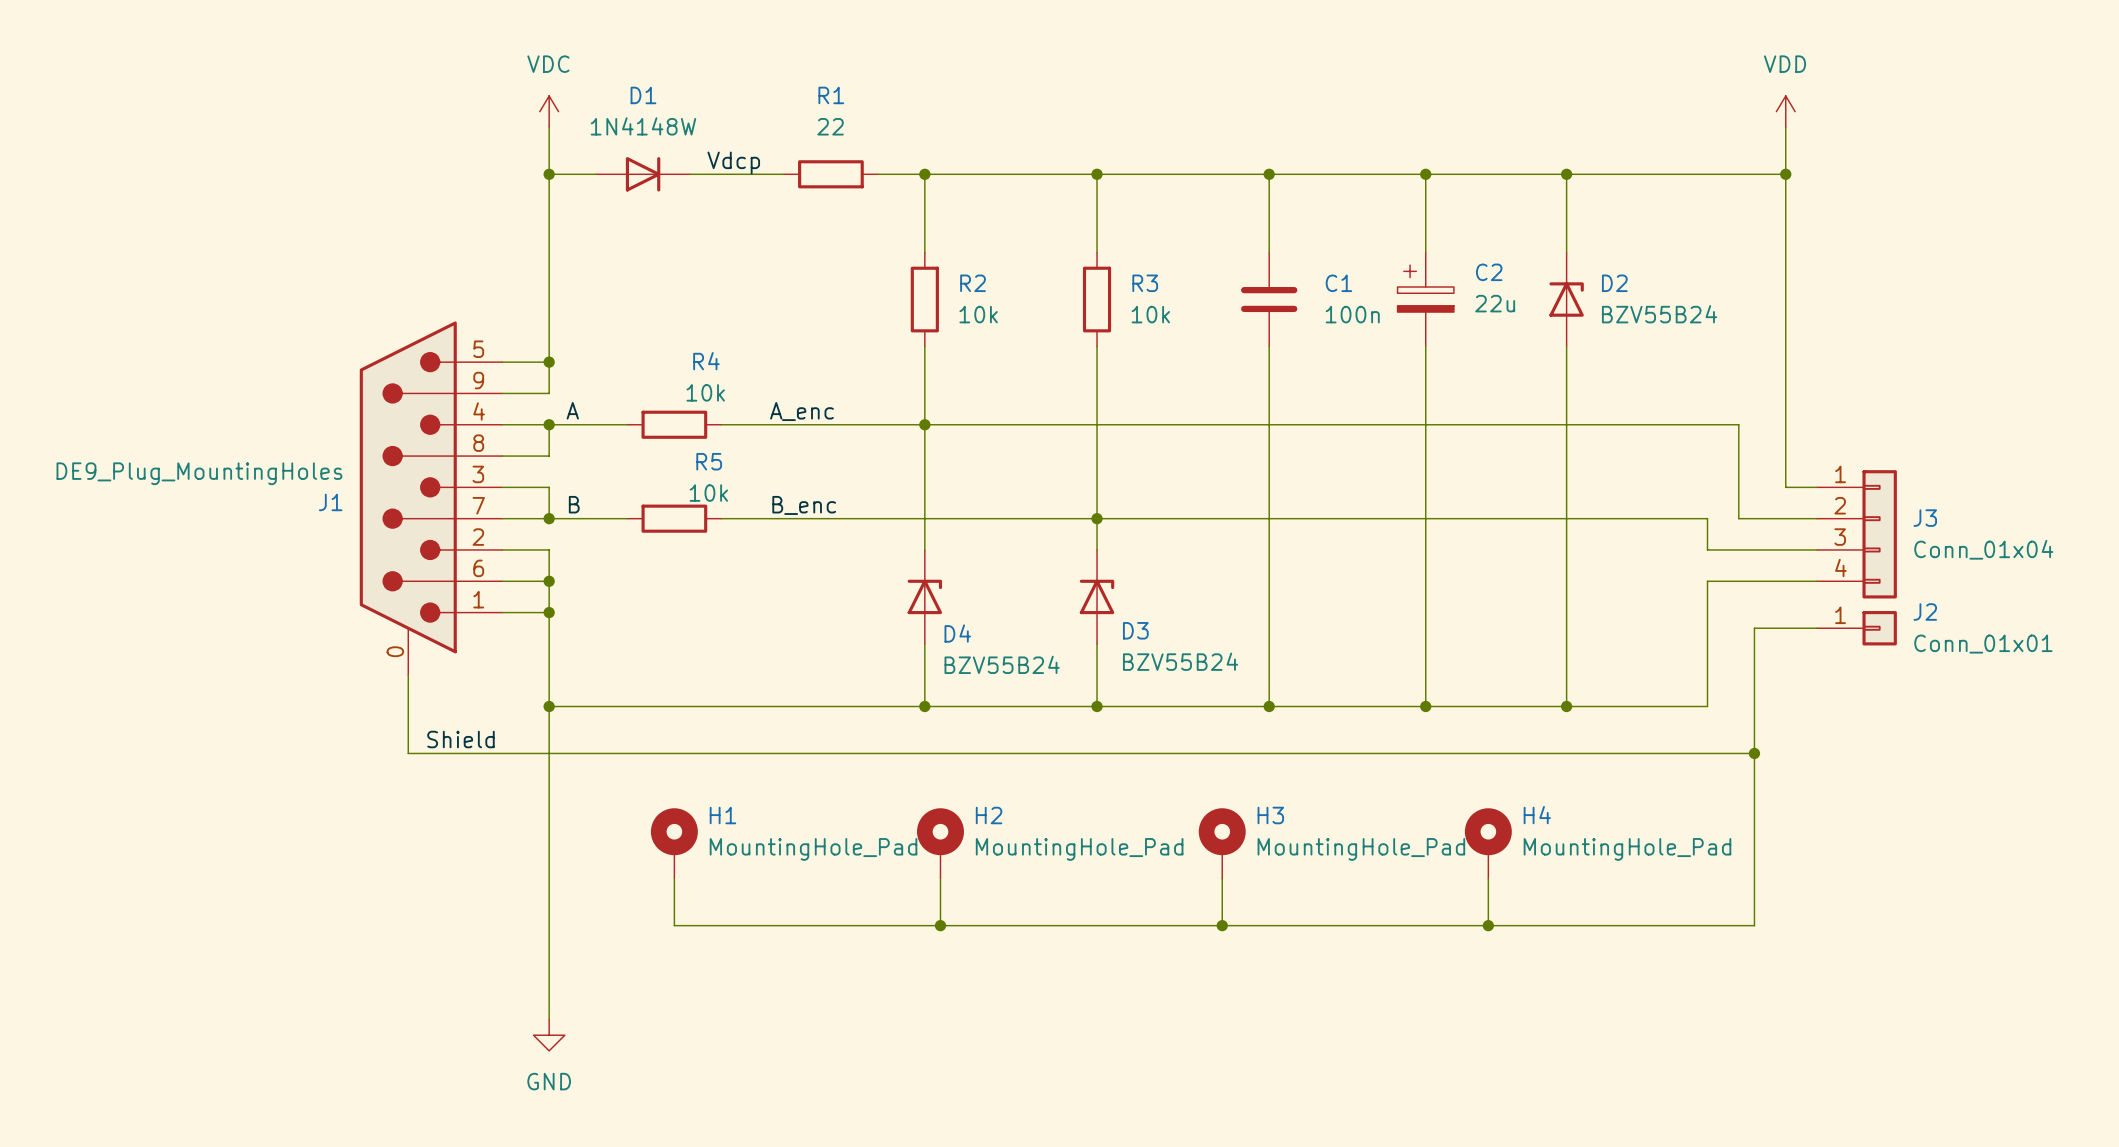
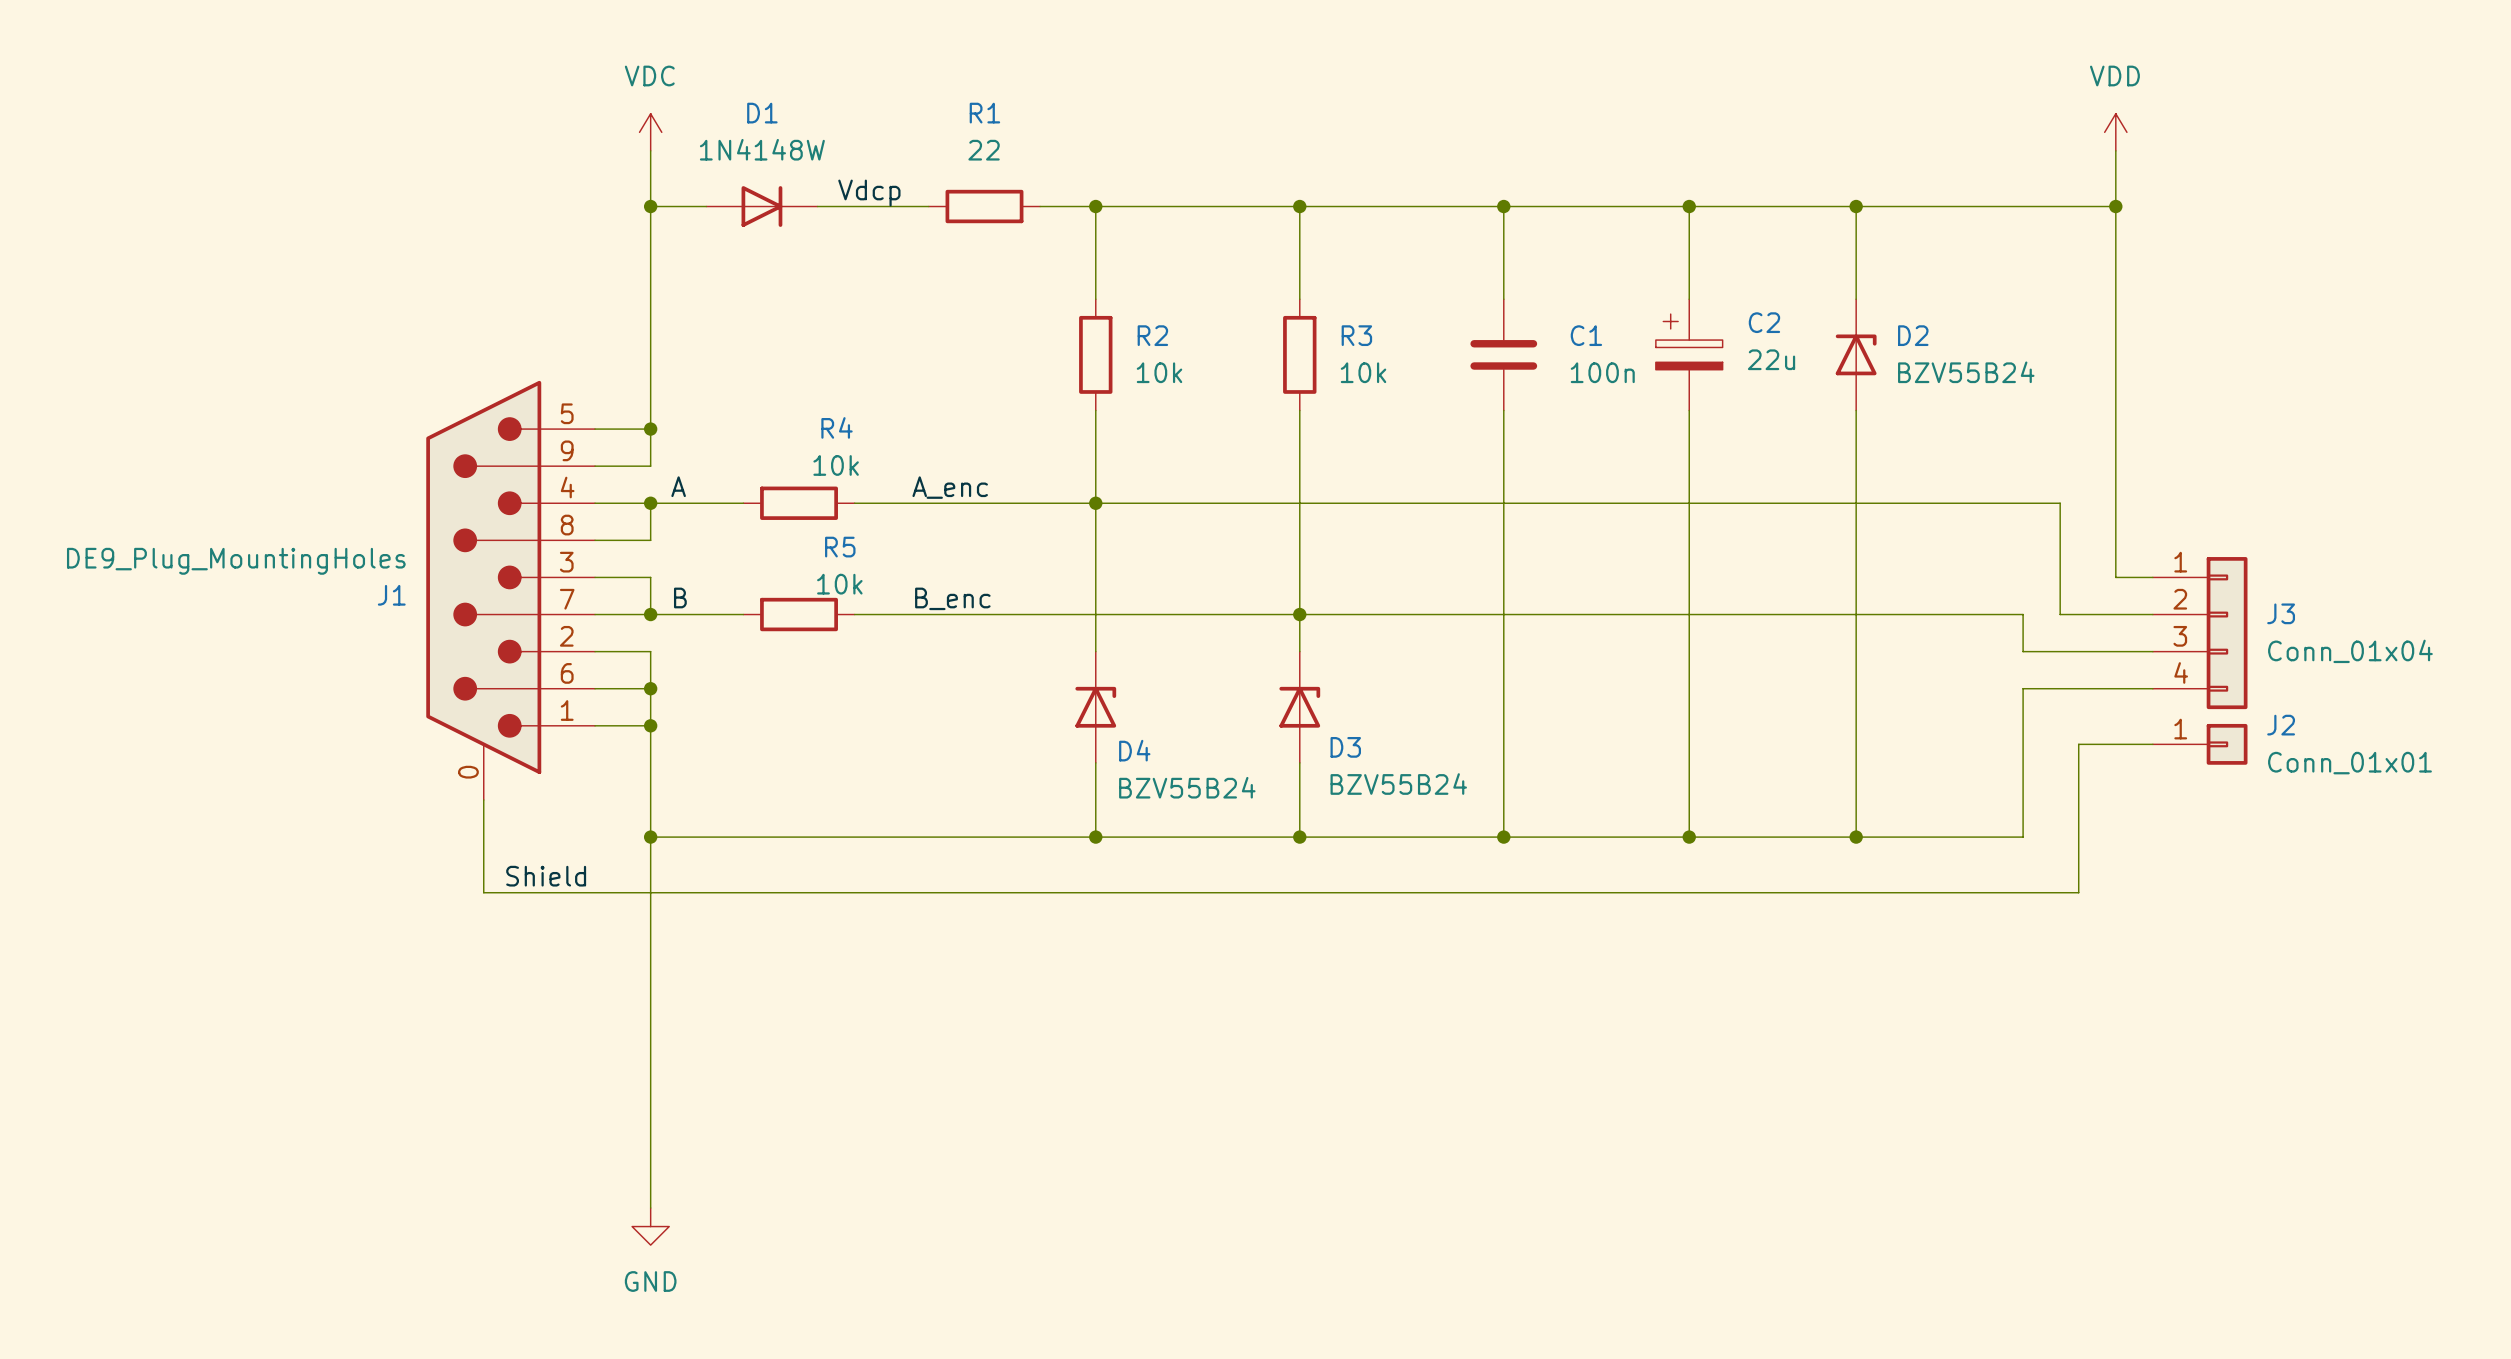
wire: (1754, 753) (1754, 925) (674, 925) (674, 878) -> none
junction: (1754, 753) -> none
H1: MountingHole_Pad (674, 843) -> none
H2: MountingHole_Pad (940, 843) -> none
H3: MountingHole_Pad (1222, 843) -> none
H4: MountingHole_Pad (1488, 843) -> none
wire: (940, 878) (940, 925) -> none
wire: (1222, 878) (1222, 925) -> none
wire: (1488, 878) (1488, 925) -> none
junction: (940, 925) -> none
junction: (1222, 925) -> none
junction: (1488, 925) -> none

